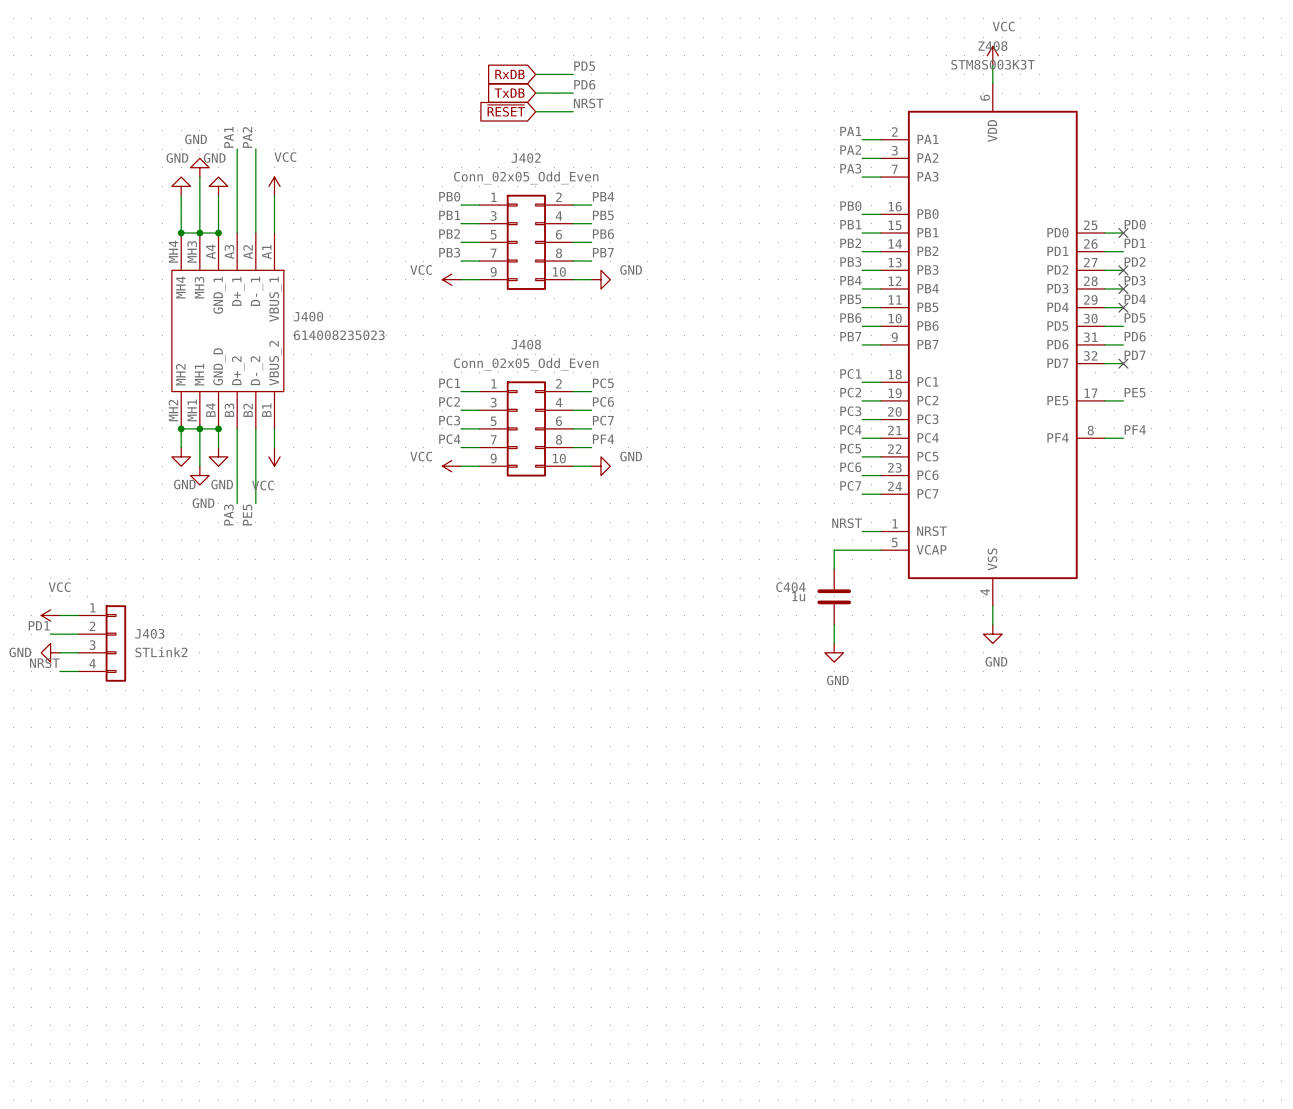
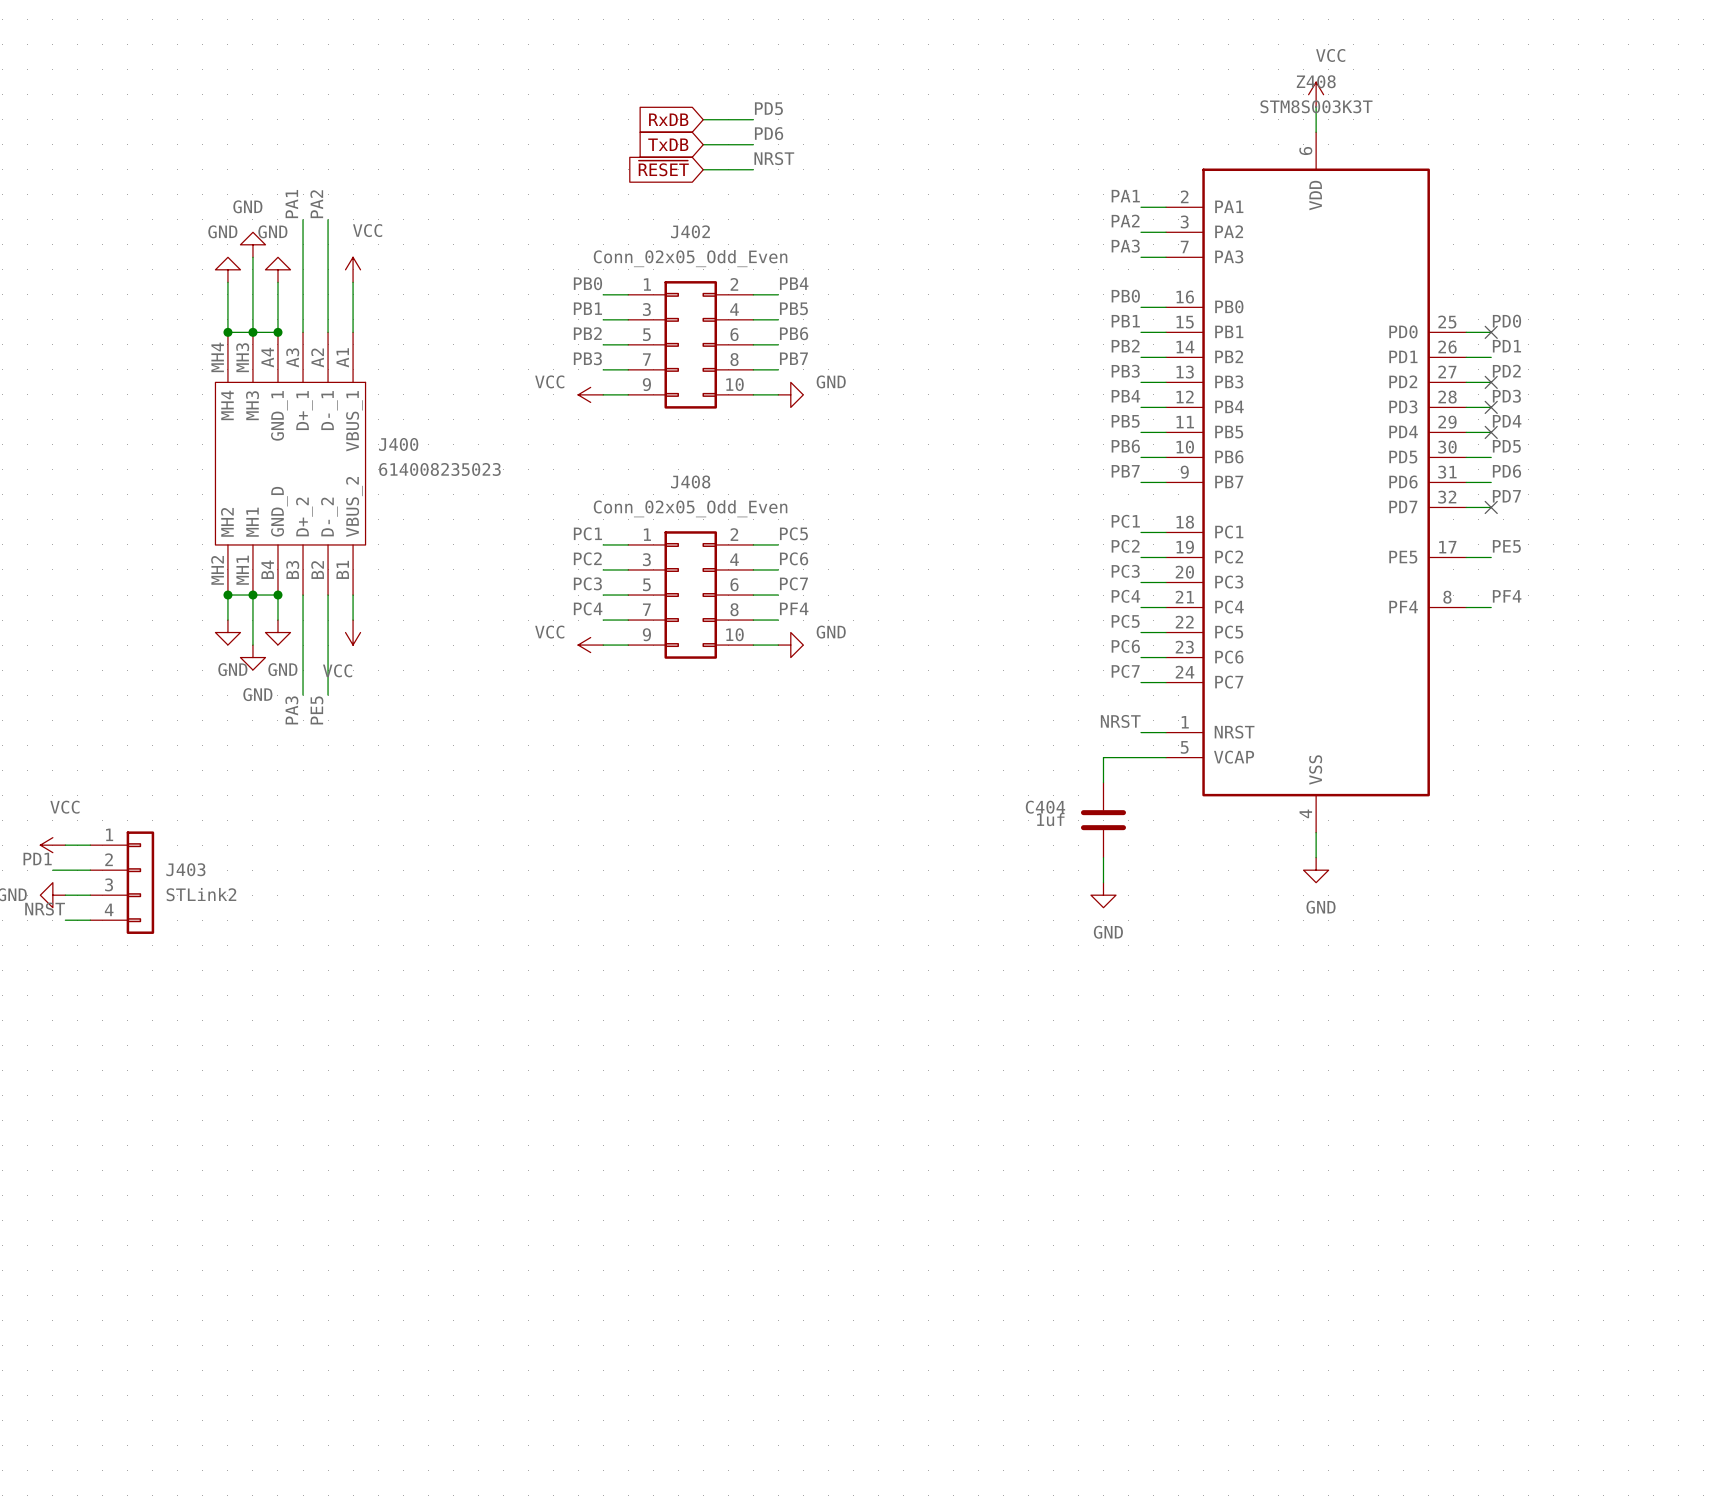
C404 value: 1u (798, 596) -> 1uf (1050, 819)

